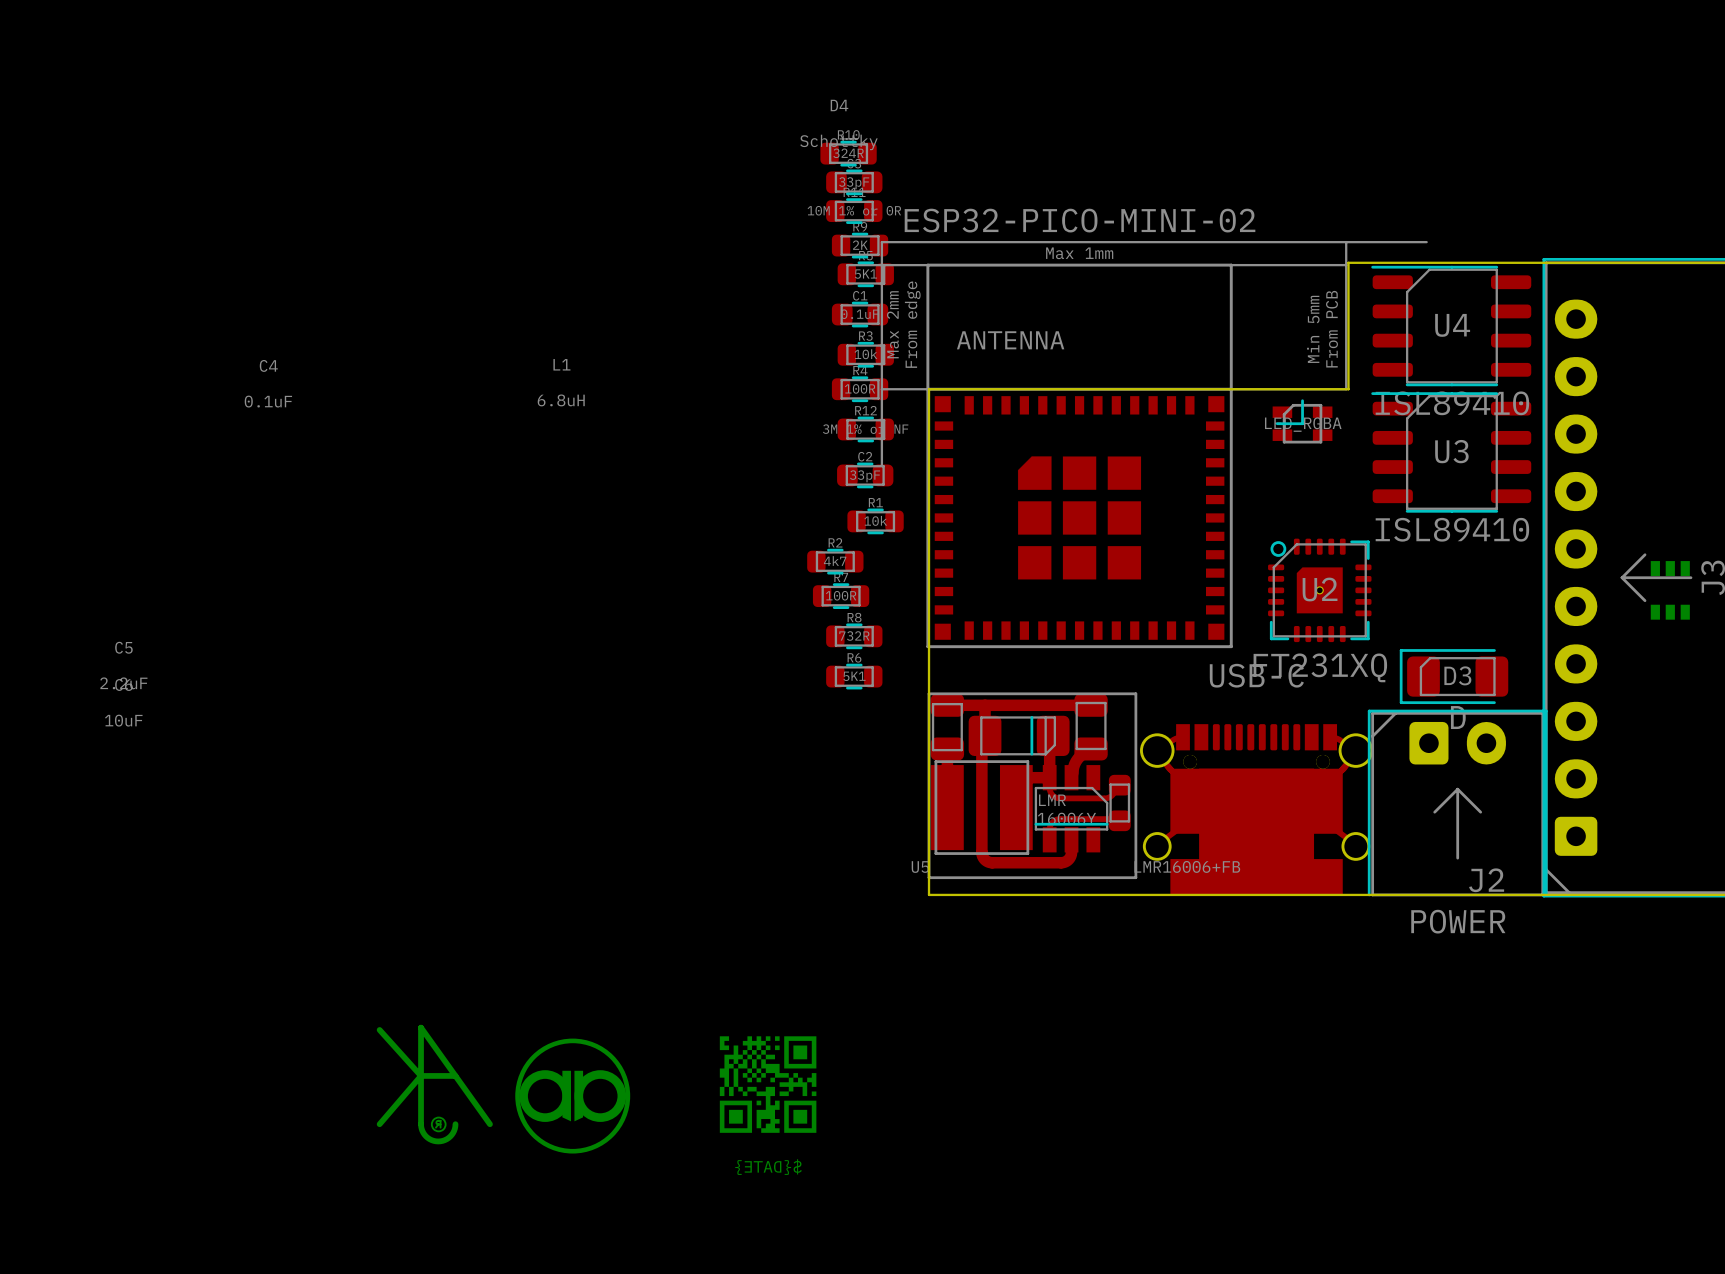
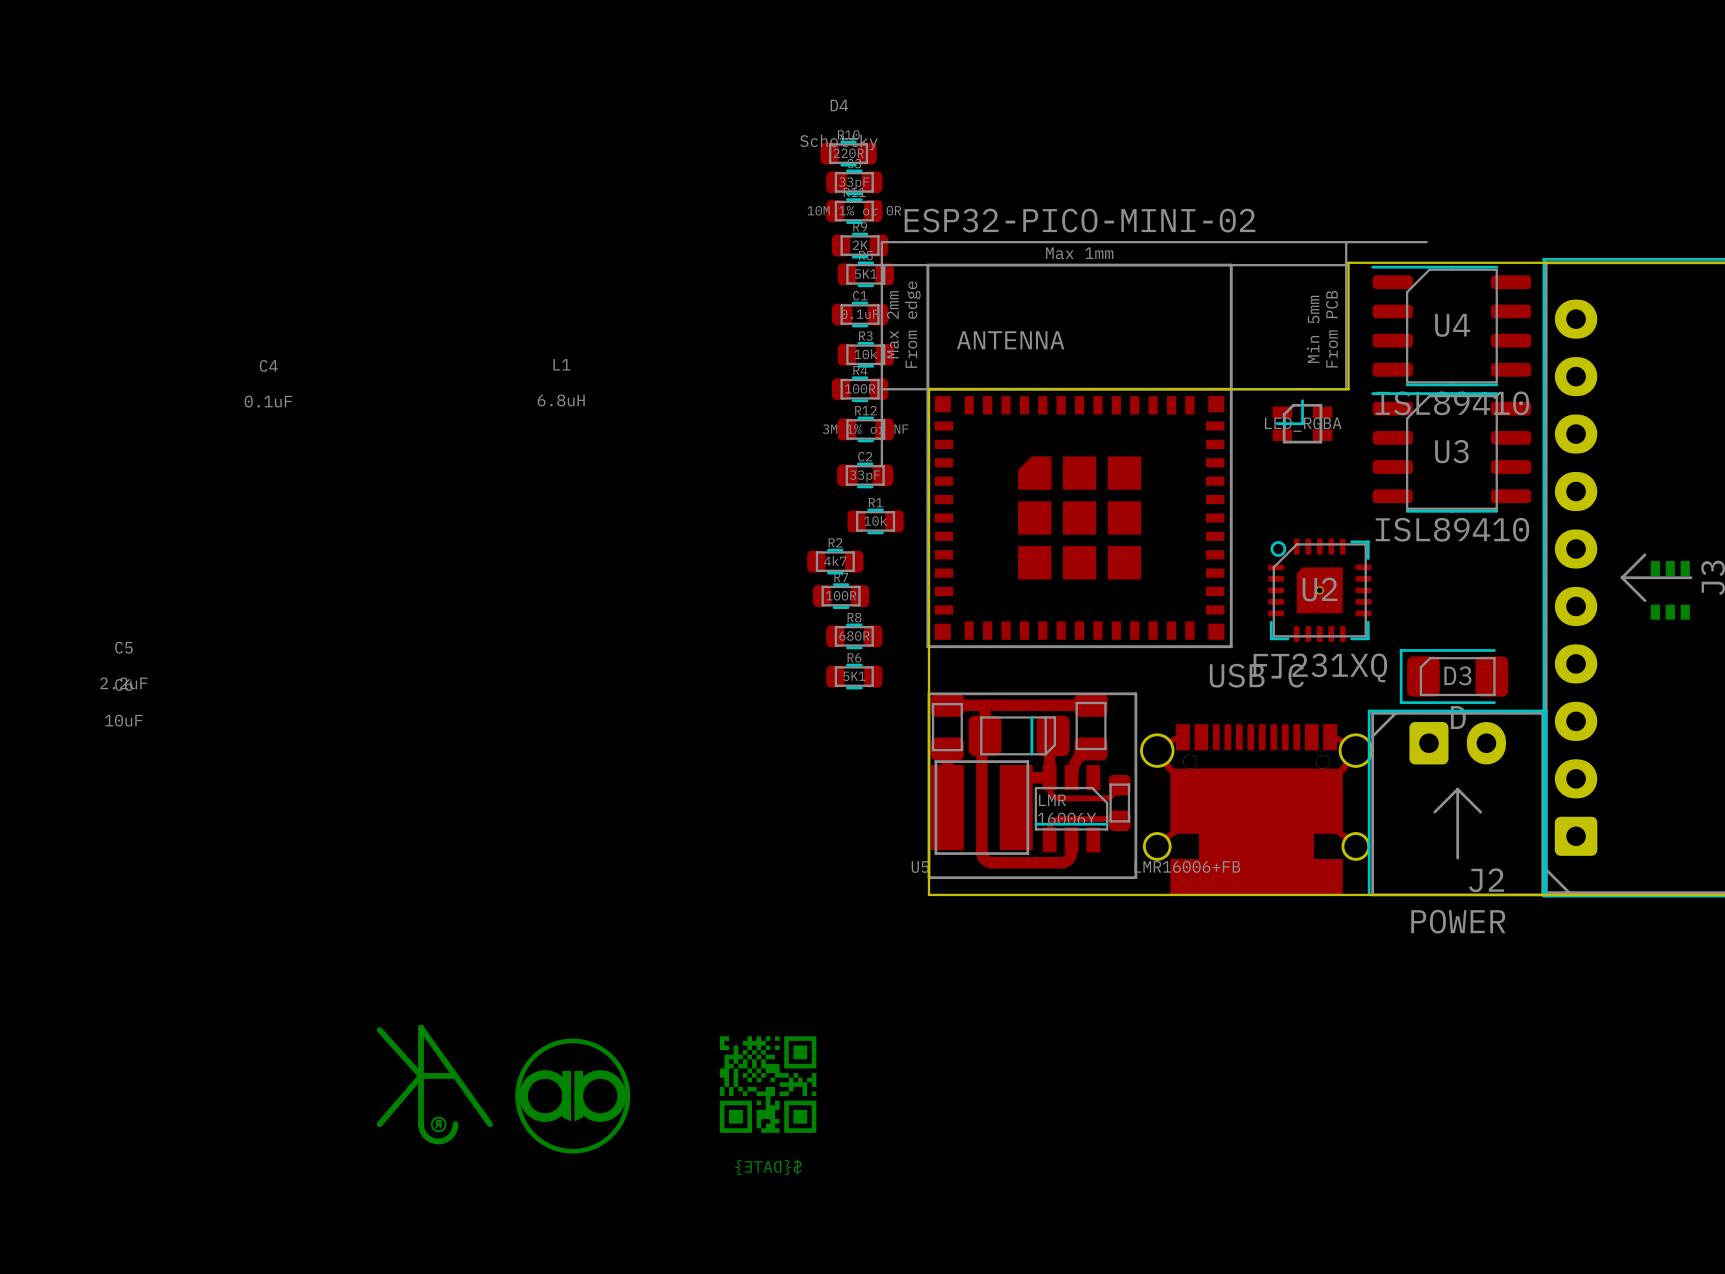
R10 value: 324R (848, 153) -> 220R (848, 153)
R8 value: 732R (854, 635) -> 680R (854, 635)

